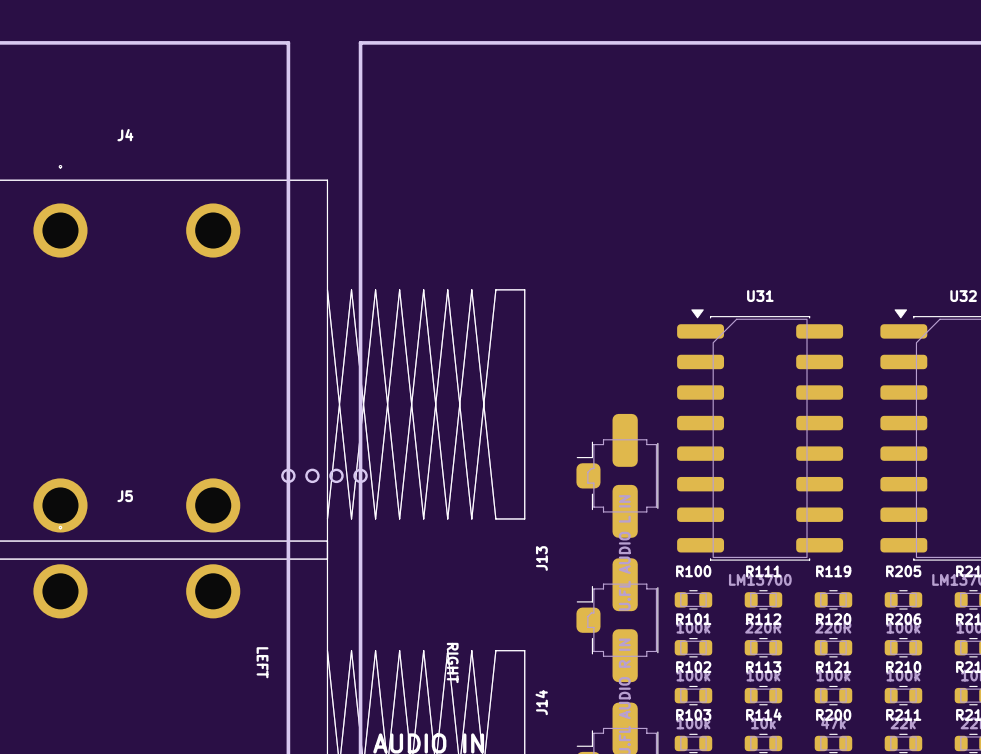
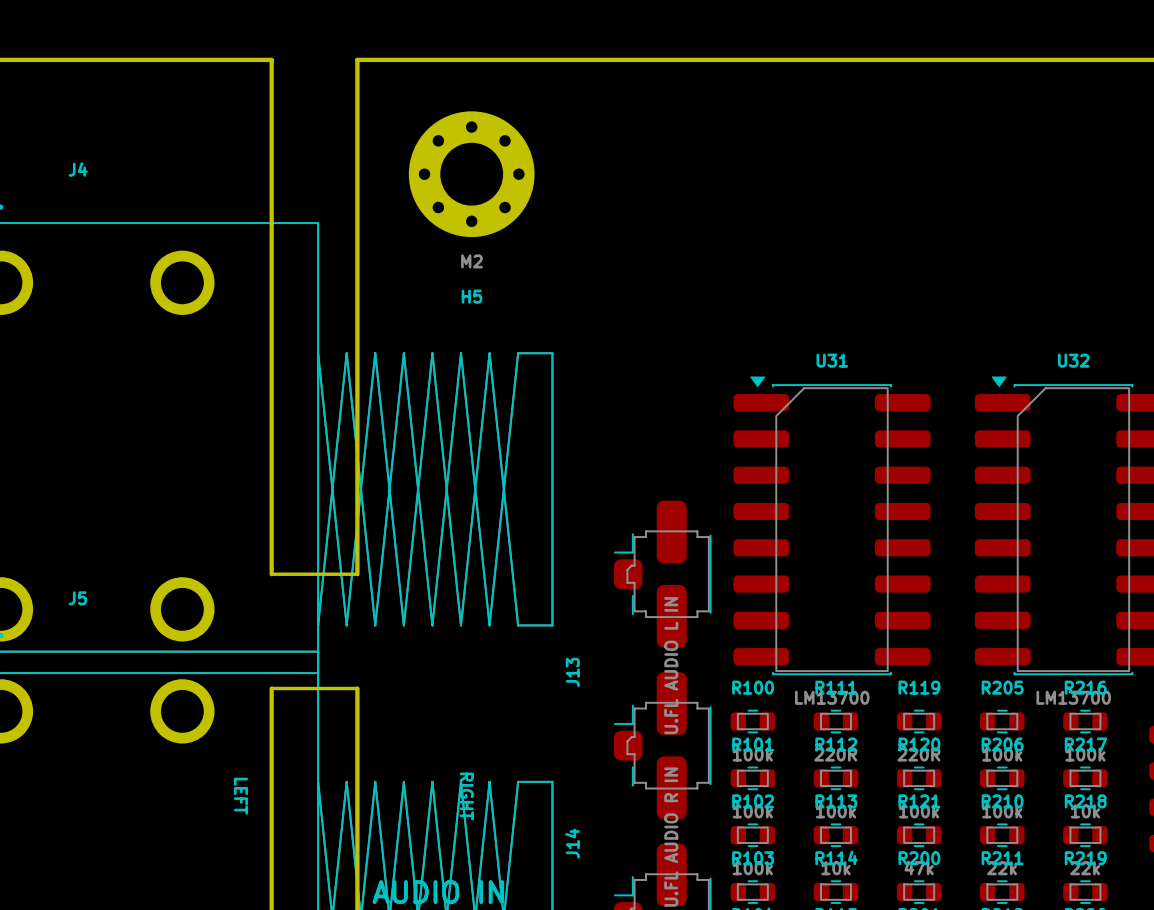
H5: none -> M2 (471, 174)
round board edge: [281, 468, 296, 484] -> none
round board edge: [305, 468, 320, 484] -> none
round board edge: [329, 468, 344, 484] -> none
round board edge: [353, 468, 368, 484] -> none
board edge: (288, 475) (288, 572) -> (271, 574) (357, 574)
board edge: (360, 475) (360, 572) -> (271, 688) (357, 688)

